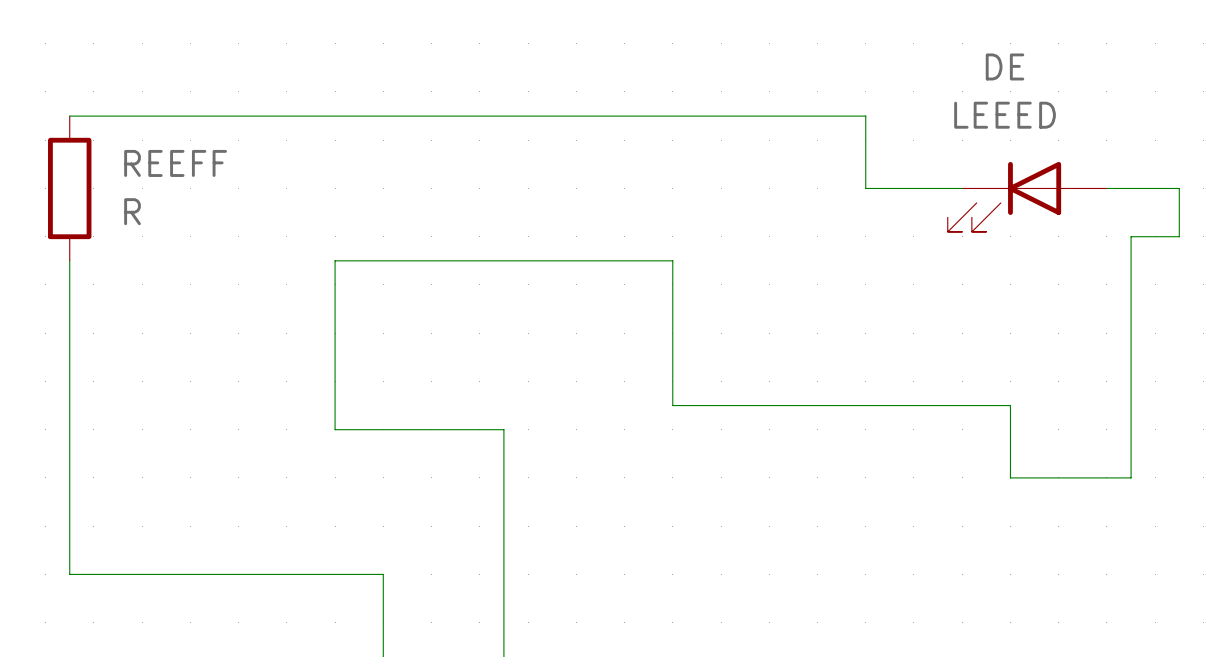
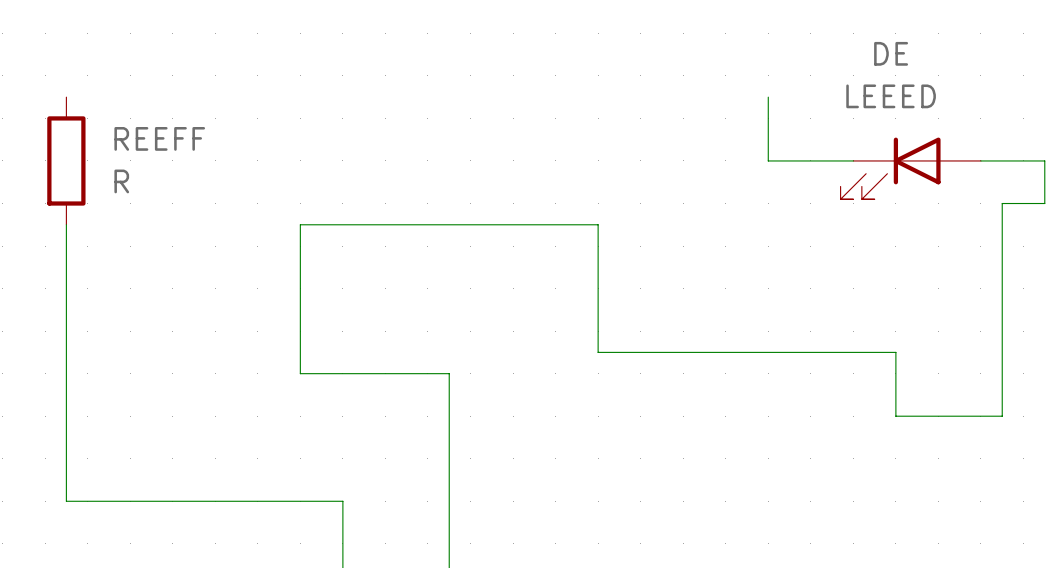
wire: (69, 116) (865, 116) -> none

